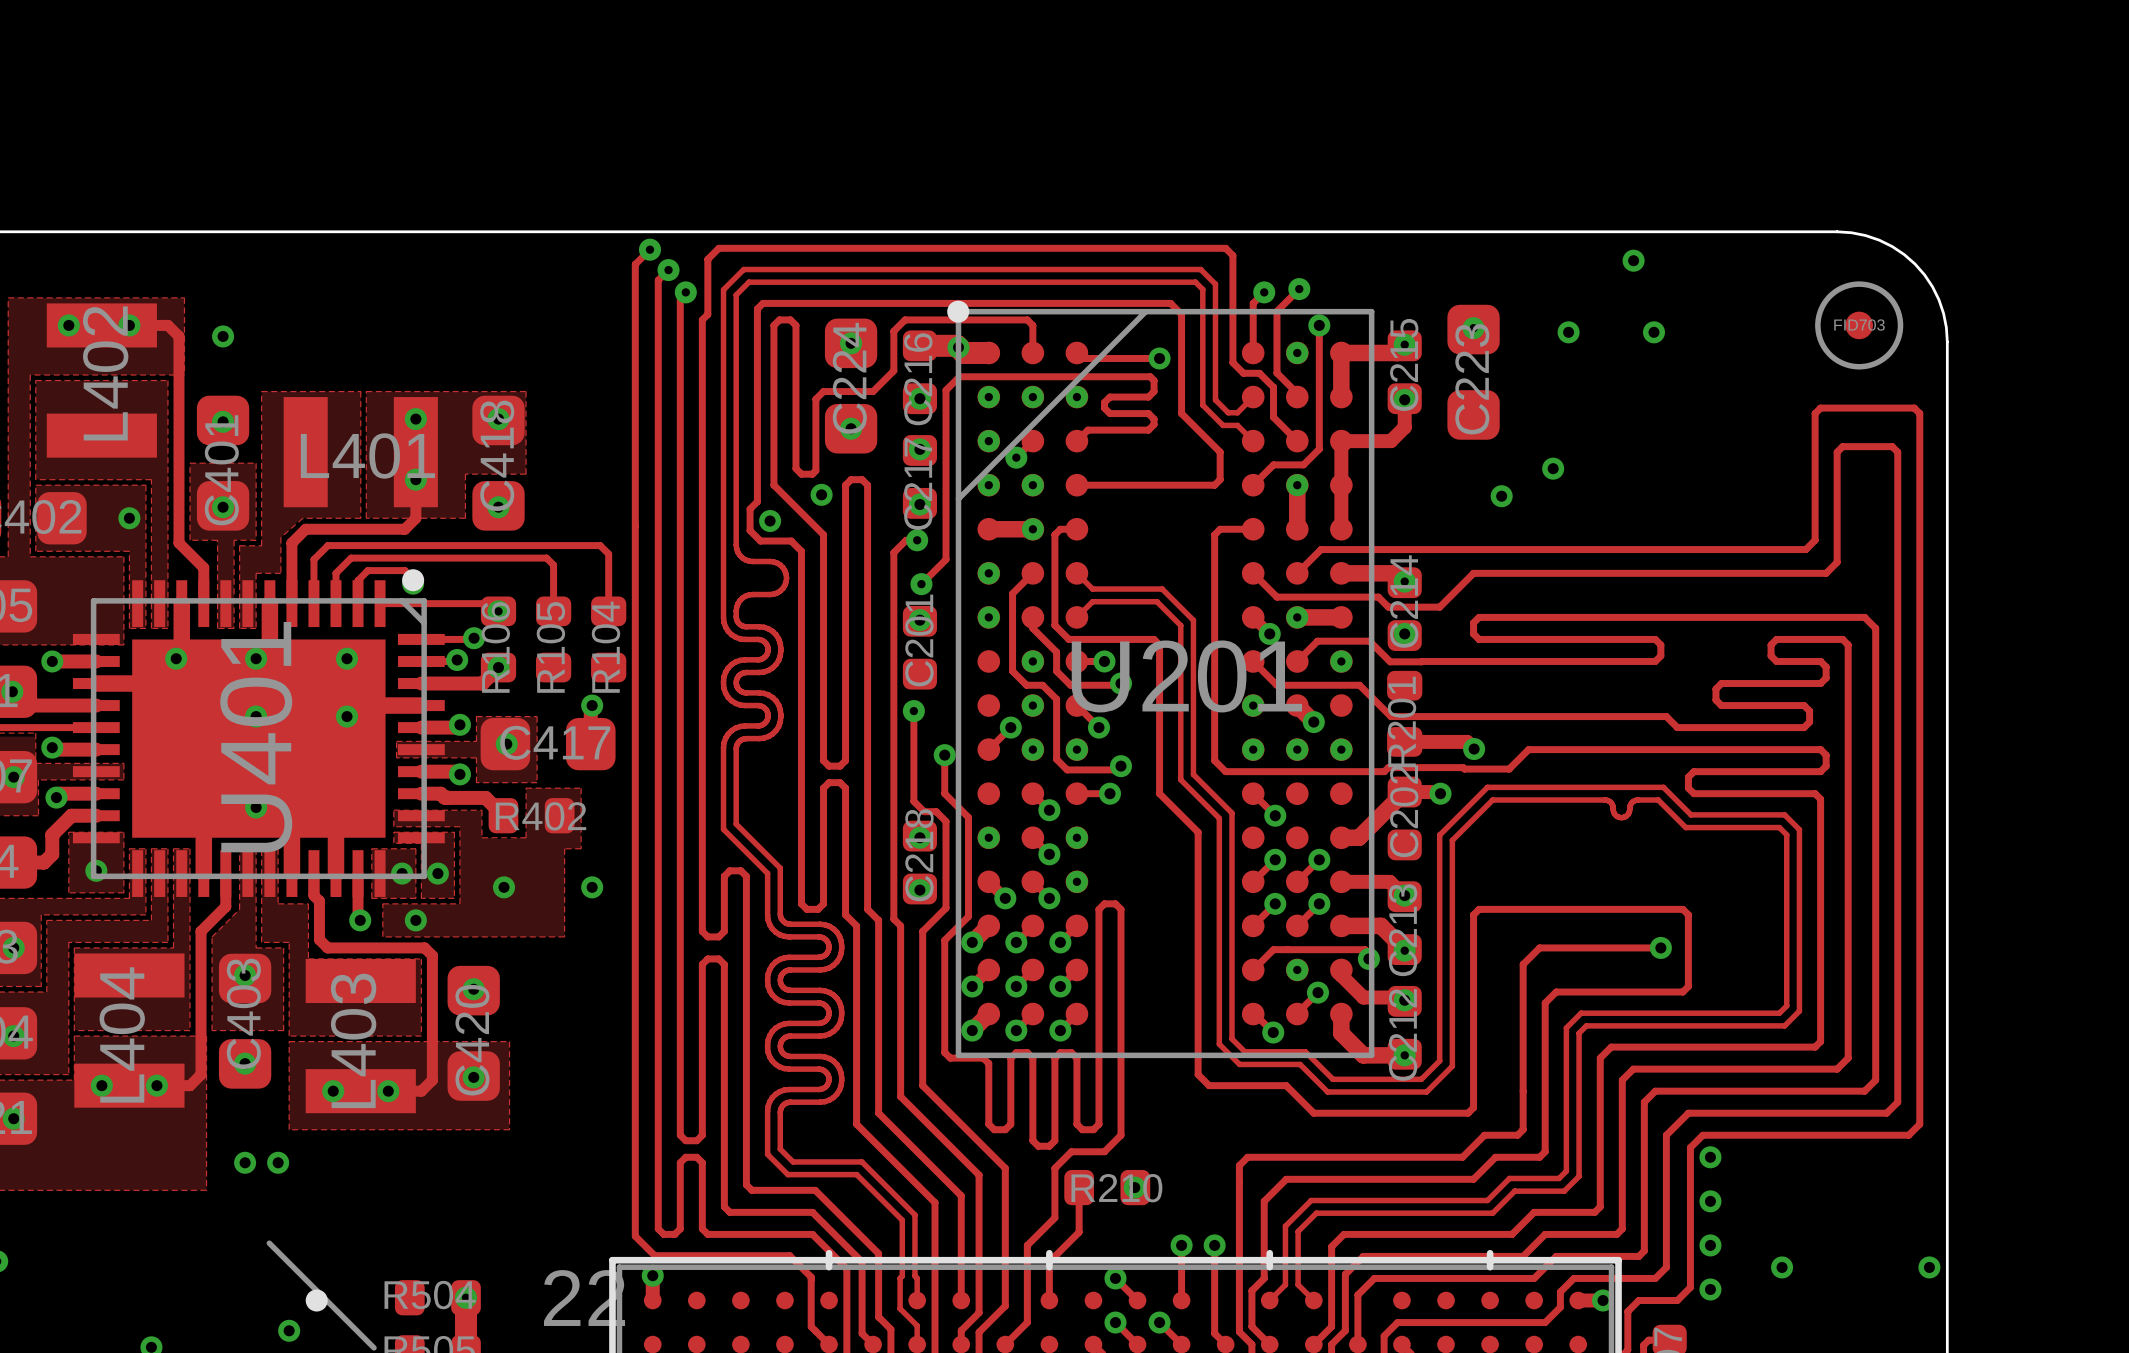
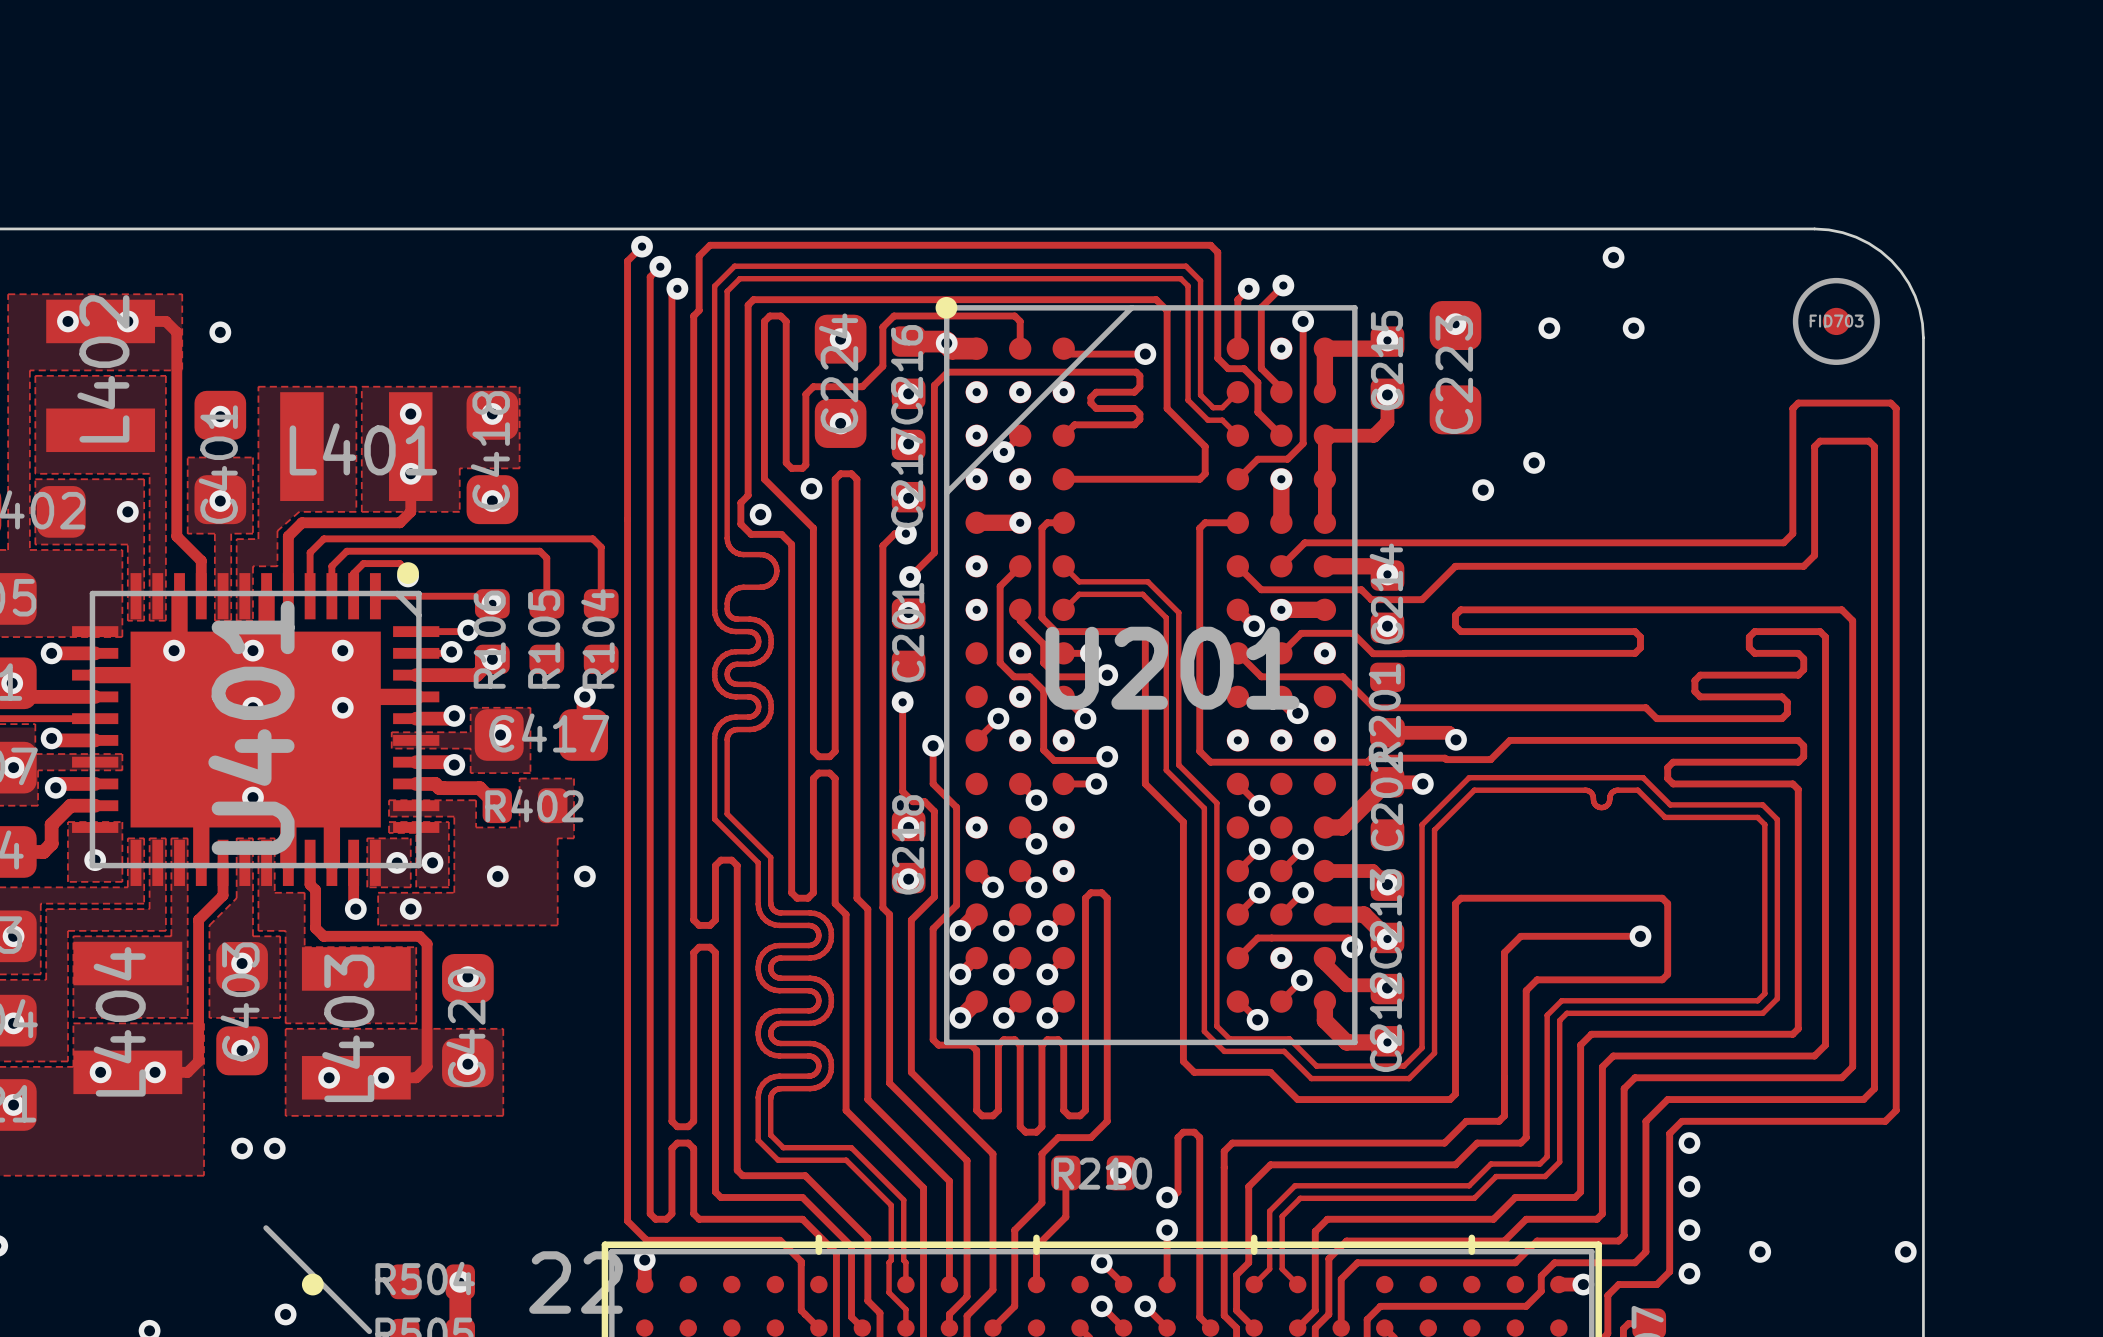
via: (1253, 705) -> none
track: none -> (1167, 1197) (1172, 1197) (1177, 1192) (1177, 1137) (1183, 1132) (1194, 1132) (1199, 1137) (1199, 1230)
via position: (1214, 1245) -> (1167, 1197)

